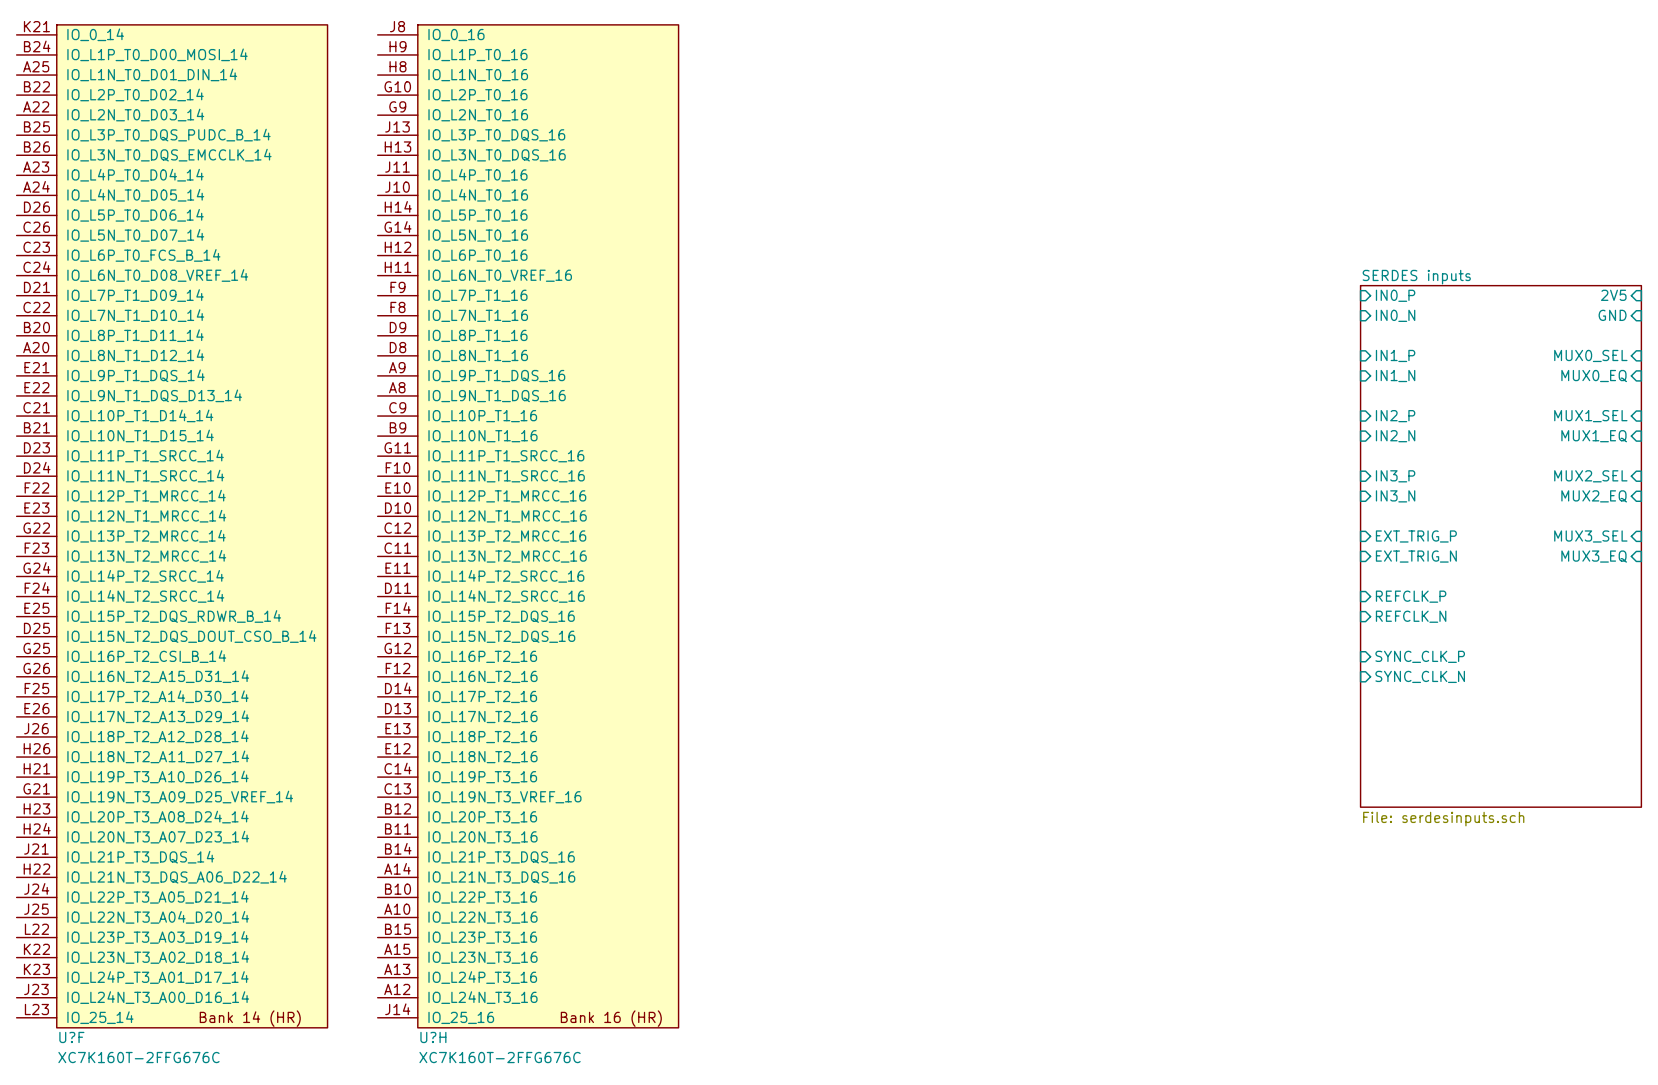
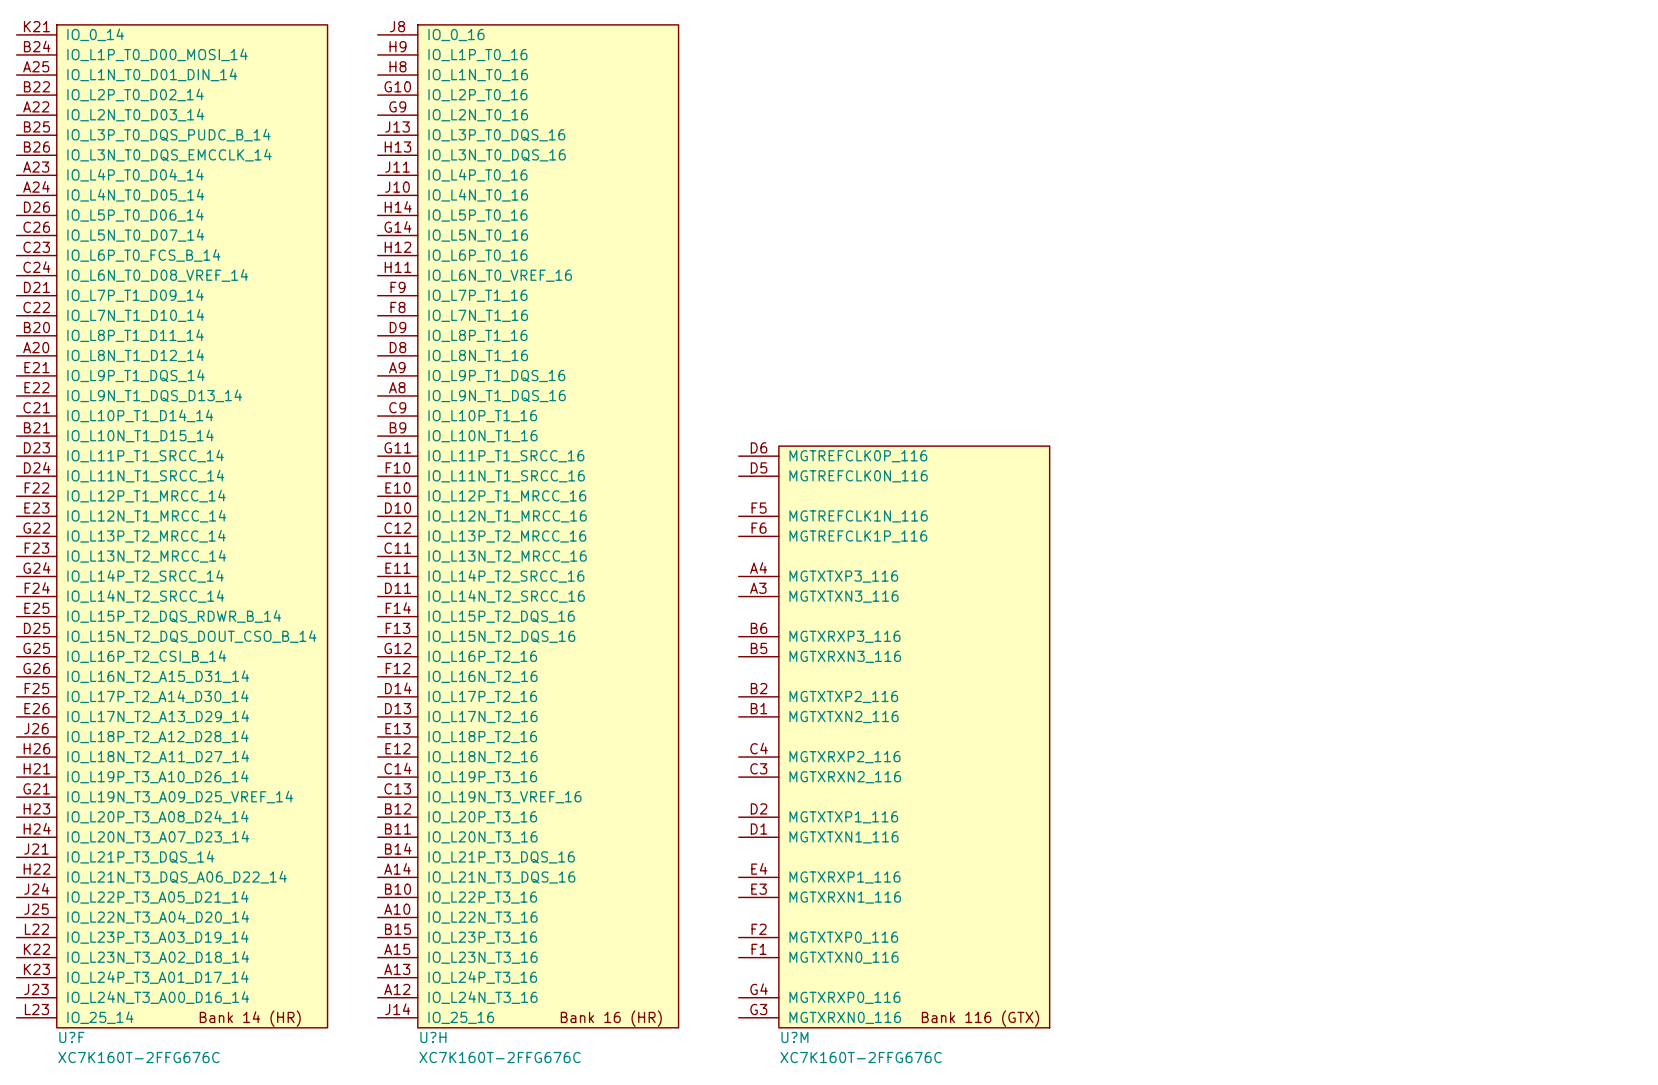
sheet pin: IN0_P (1395, 295) -> none
sheet pin: 2V5 (1613, 295) -> none
sheet pin: IN0_N (1395, 315) -> none
sheet pin: GND (1612, 315) -> none
sheet pin: IN1_P (1395, 355) -> none
sheet pin: MUX0_SEL (1590, 355) -> none
sheet pin: IN1_N (1395, 376) -> none
sheet pin: MUX0_EQ (1594, 376) -> none
sheet pin: IN2_P (1395, 416) -> none
sheet pin: MUX1_SEL (1590, 416) -> none
sheet pin: IN2_N (1395, 436) -> none
sheet pin: MUX1_EQ (1594, 436) -> none
sheet pin: IN3_P (1395, 476) -> none
sheet pin: MUX2_SEL (1590, 476) -> none
sheet pin: IN3_N (1395, 496) -> none
sheet pin: MUX2_EQ (1594, 496) -> none
sheet pin: EXT_TRIG_P (1416, 536) -> none
sheet pin: MUX3_SEL (1590, 536) -> none
sheet SERDES inputs: File: serdesinputs.sch (1500, 546) -> none
sheet pin: EXT_TRIG_N (1416, 556) -> none
sheet pin: MUX3_EQ (1594, 556) -> none
sheet pin: REFCLK_P (1411, 596) -> none
sheet pin: REFCLK_N (1411, 616) -> none
sheet pin: SYNC_CLK_P (1420, 656) -> none
sheet pin: SYNC_CLK_N (1420, 676) -> none
U?M: none -> XC7K160T-2FFG676C (894, 736)

